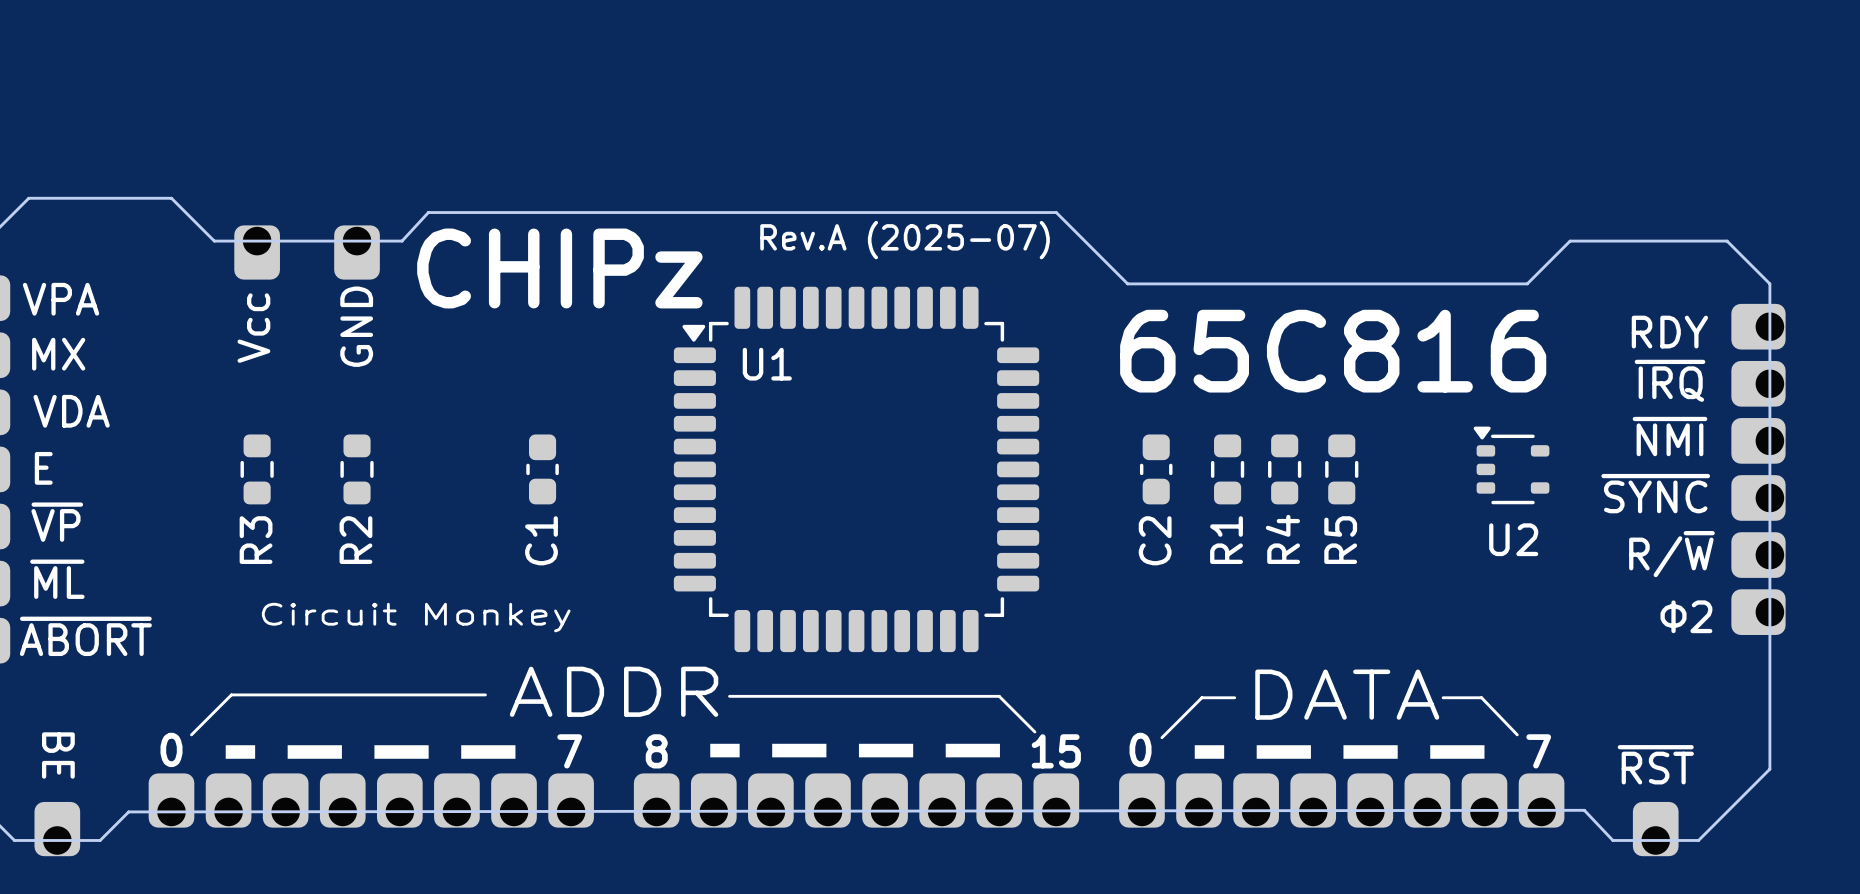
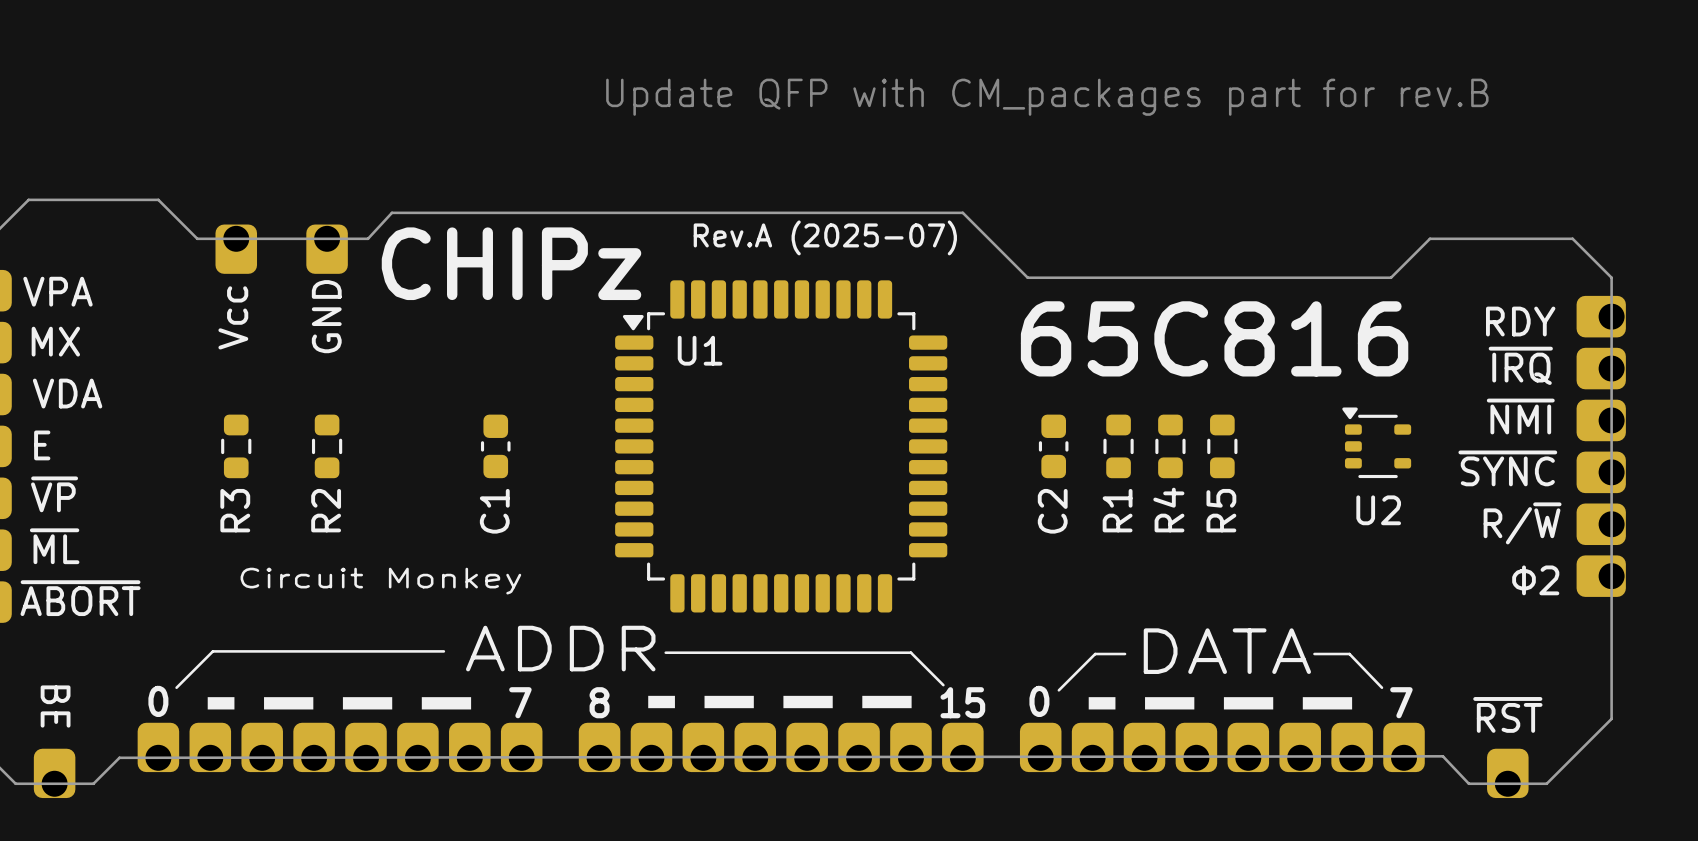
text: none -> Update QFP with CM_packages part for rev.B (1047, 97)

